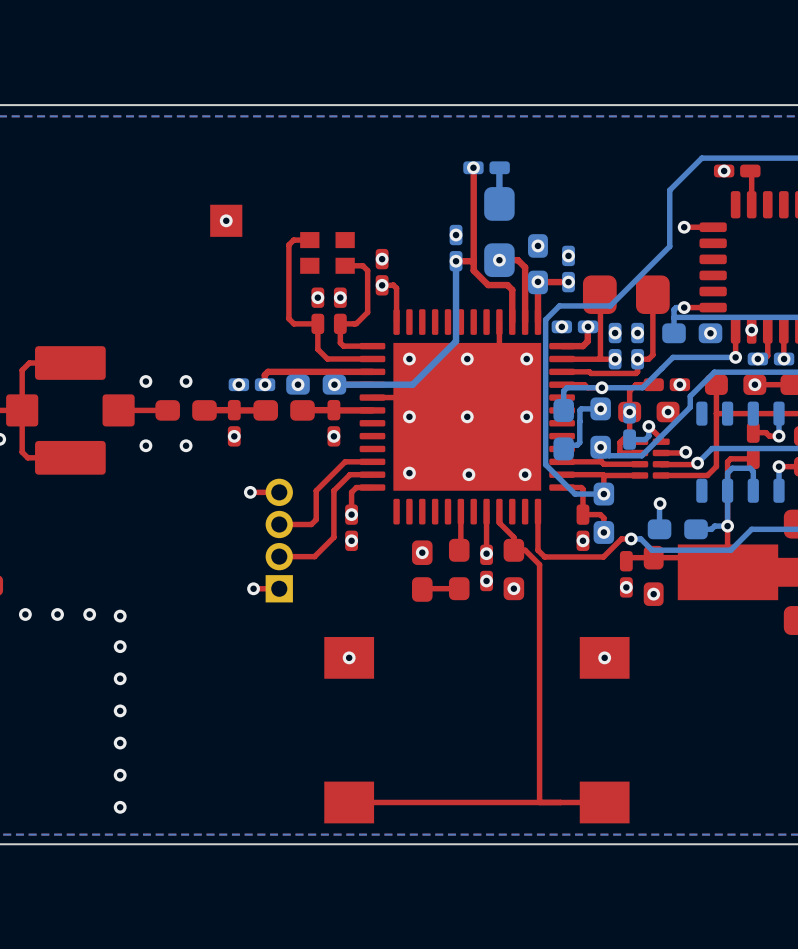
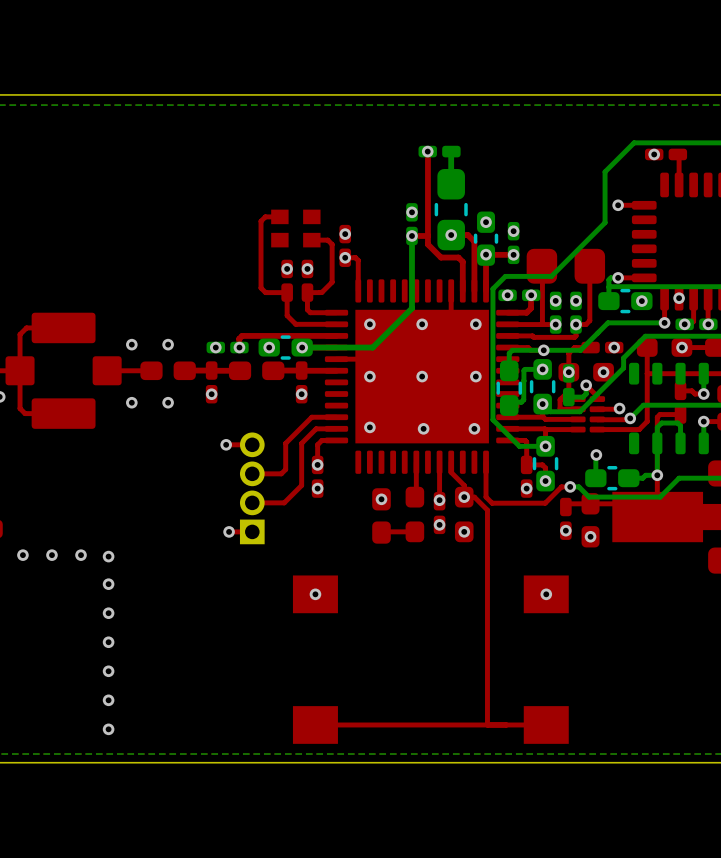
part footprint: [484, 187, 515, 278] -> [434, 168, 468, 251]
part: (226, 220) -> none
via: (226, 220) -> none
part footprint: [528, 234, 548, 295] -> [473, 211, 499, 266]
part footprint: [662, 323, 723, 344] -> [598, 288, 653, 314]
part footprint: [286, 374, 347, 395] -> [258, 335, 313, 360]
part footprint: [590, 397, 611, 459] -> [529, 359, 556, 415]
part footprint: [553, 399, 574, 461] -> [496, 360, 523, 416]
part footprint: [593, 482, 615, 544] -> [532, 435, 559, 492]
part footprint: [647, 519, 708, 540] -> [585, 466, 640, 491]
via: none -> (464, 497)

